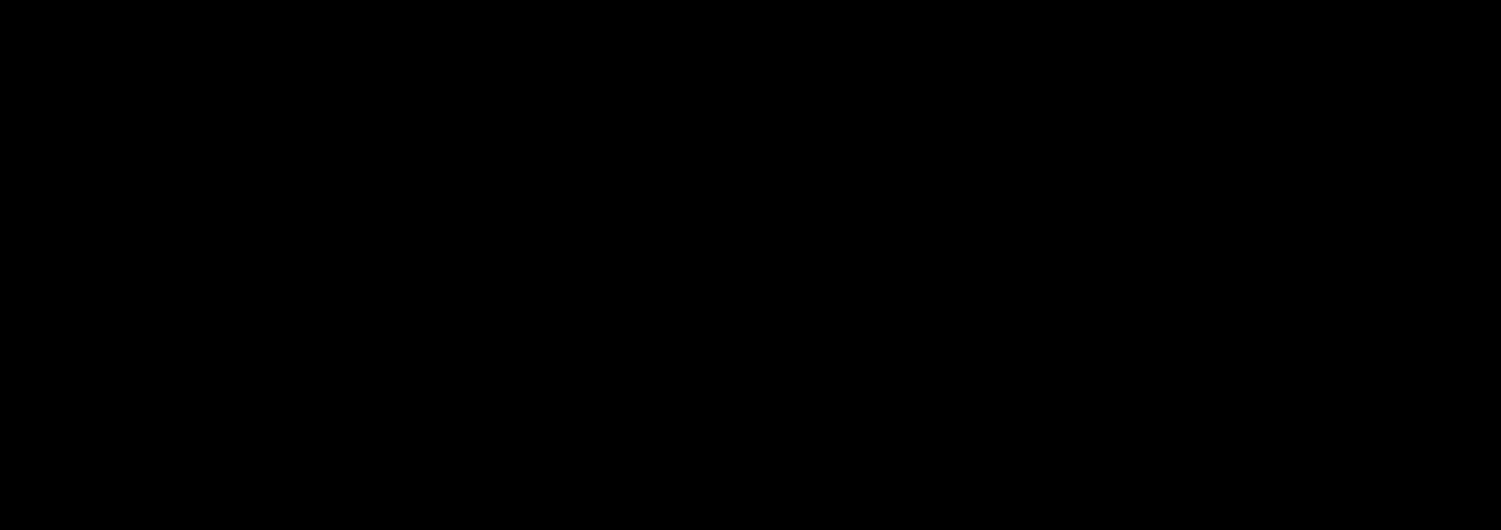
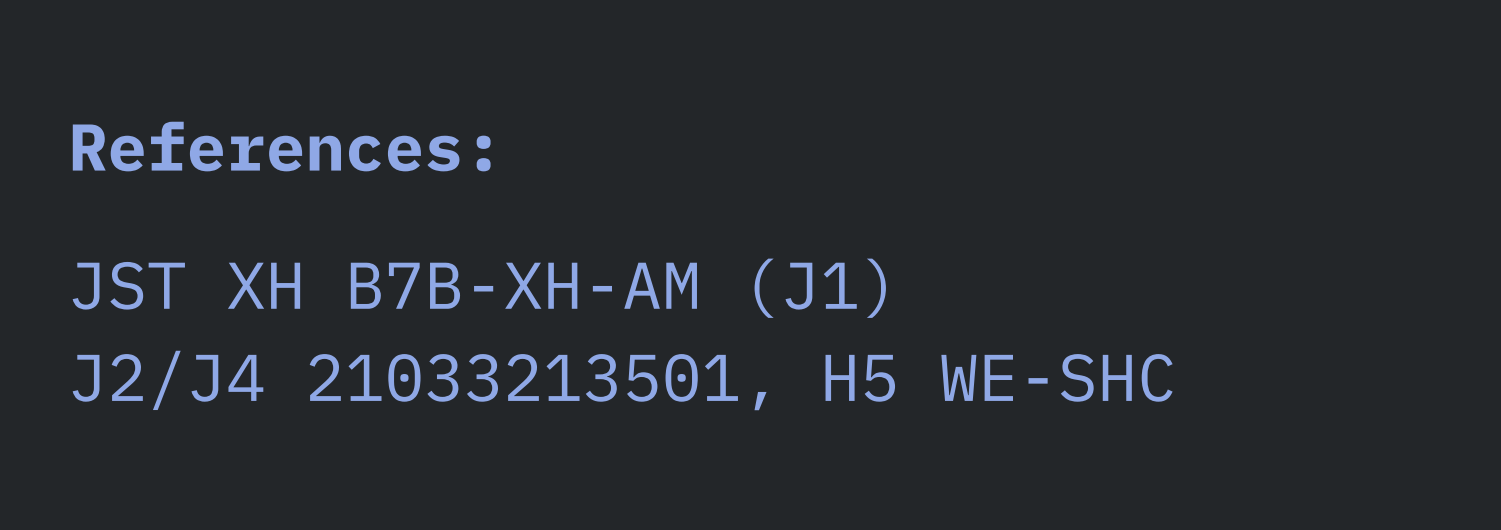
text: none -> References: (281, 146)
text: none -> JST XH B7B-XH-AM (J1) (479, 288)
text: none -> J2/J4 21033213501, H5 WE-SHC (622, 380)

